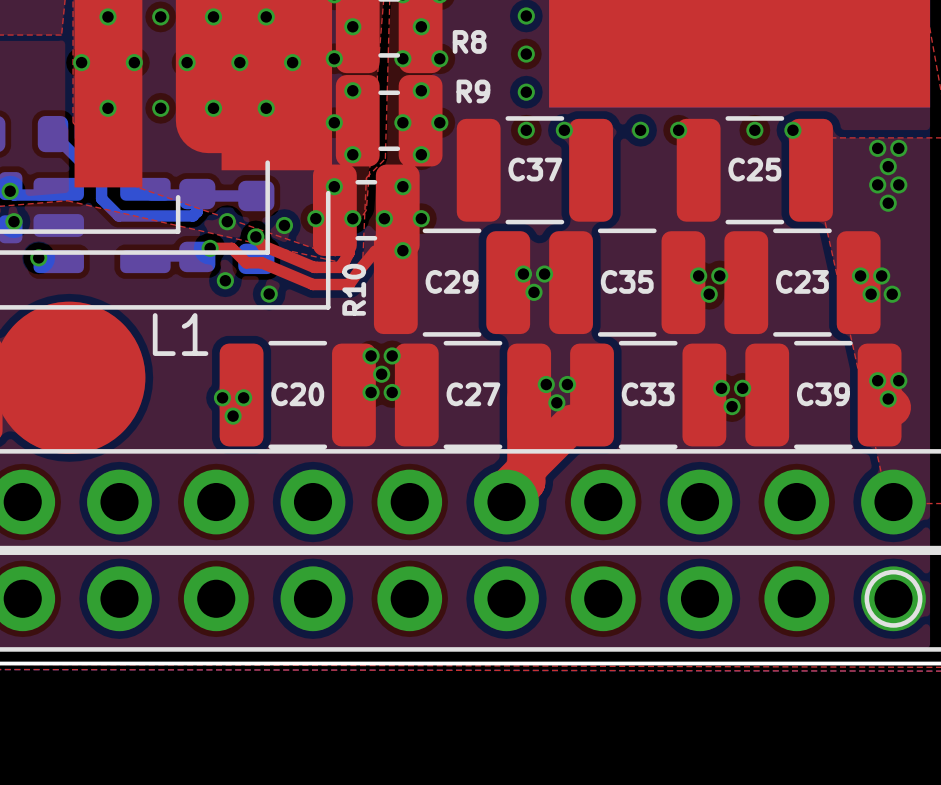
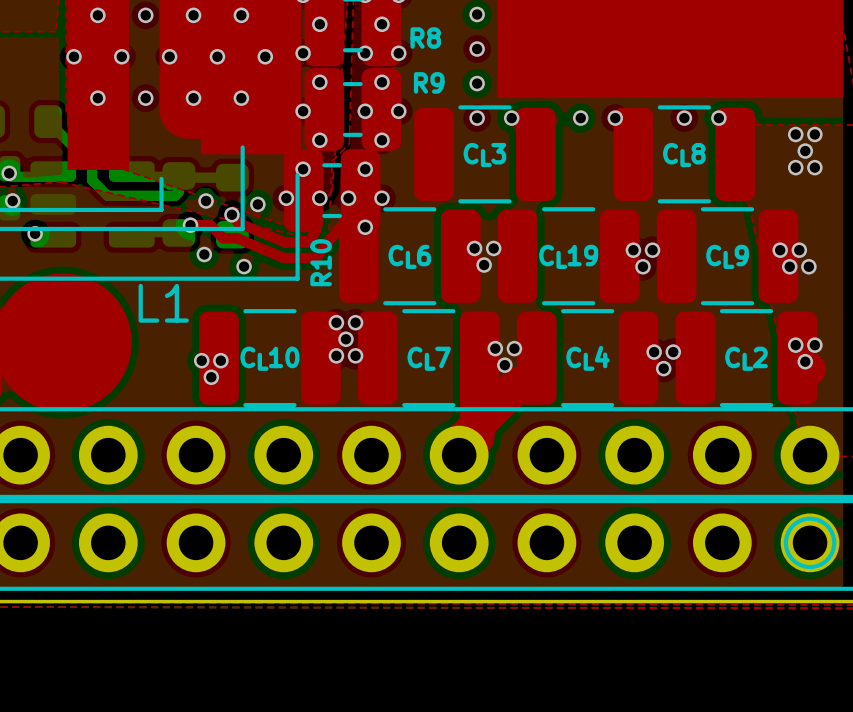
C37 name: C37 (535, 169) -> CL3 (484, 155)
C25 name: C25 (754, 169) -> CL8 (684, 155)
via: (888, 203) -> none
C29 name: C29 (452, 281) -> CL6 (409, 256)
C35 name: C35 (627, 281) -> CL19 (568, 256)
C23 name: C23 (802, 281) -> CL9 (727, 256)
C20 name: C20 (297, 394) -> CL10 (269, 358)
C27 name: C27 (473, 394) -> CL7 (429, 358)
C33 name: C33 (648, 394) -> CL4 (588, 358)
C39 name: C39 (823, 394) -> CL2 (746, 358)

